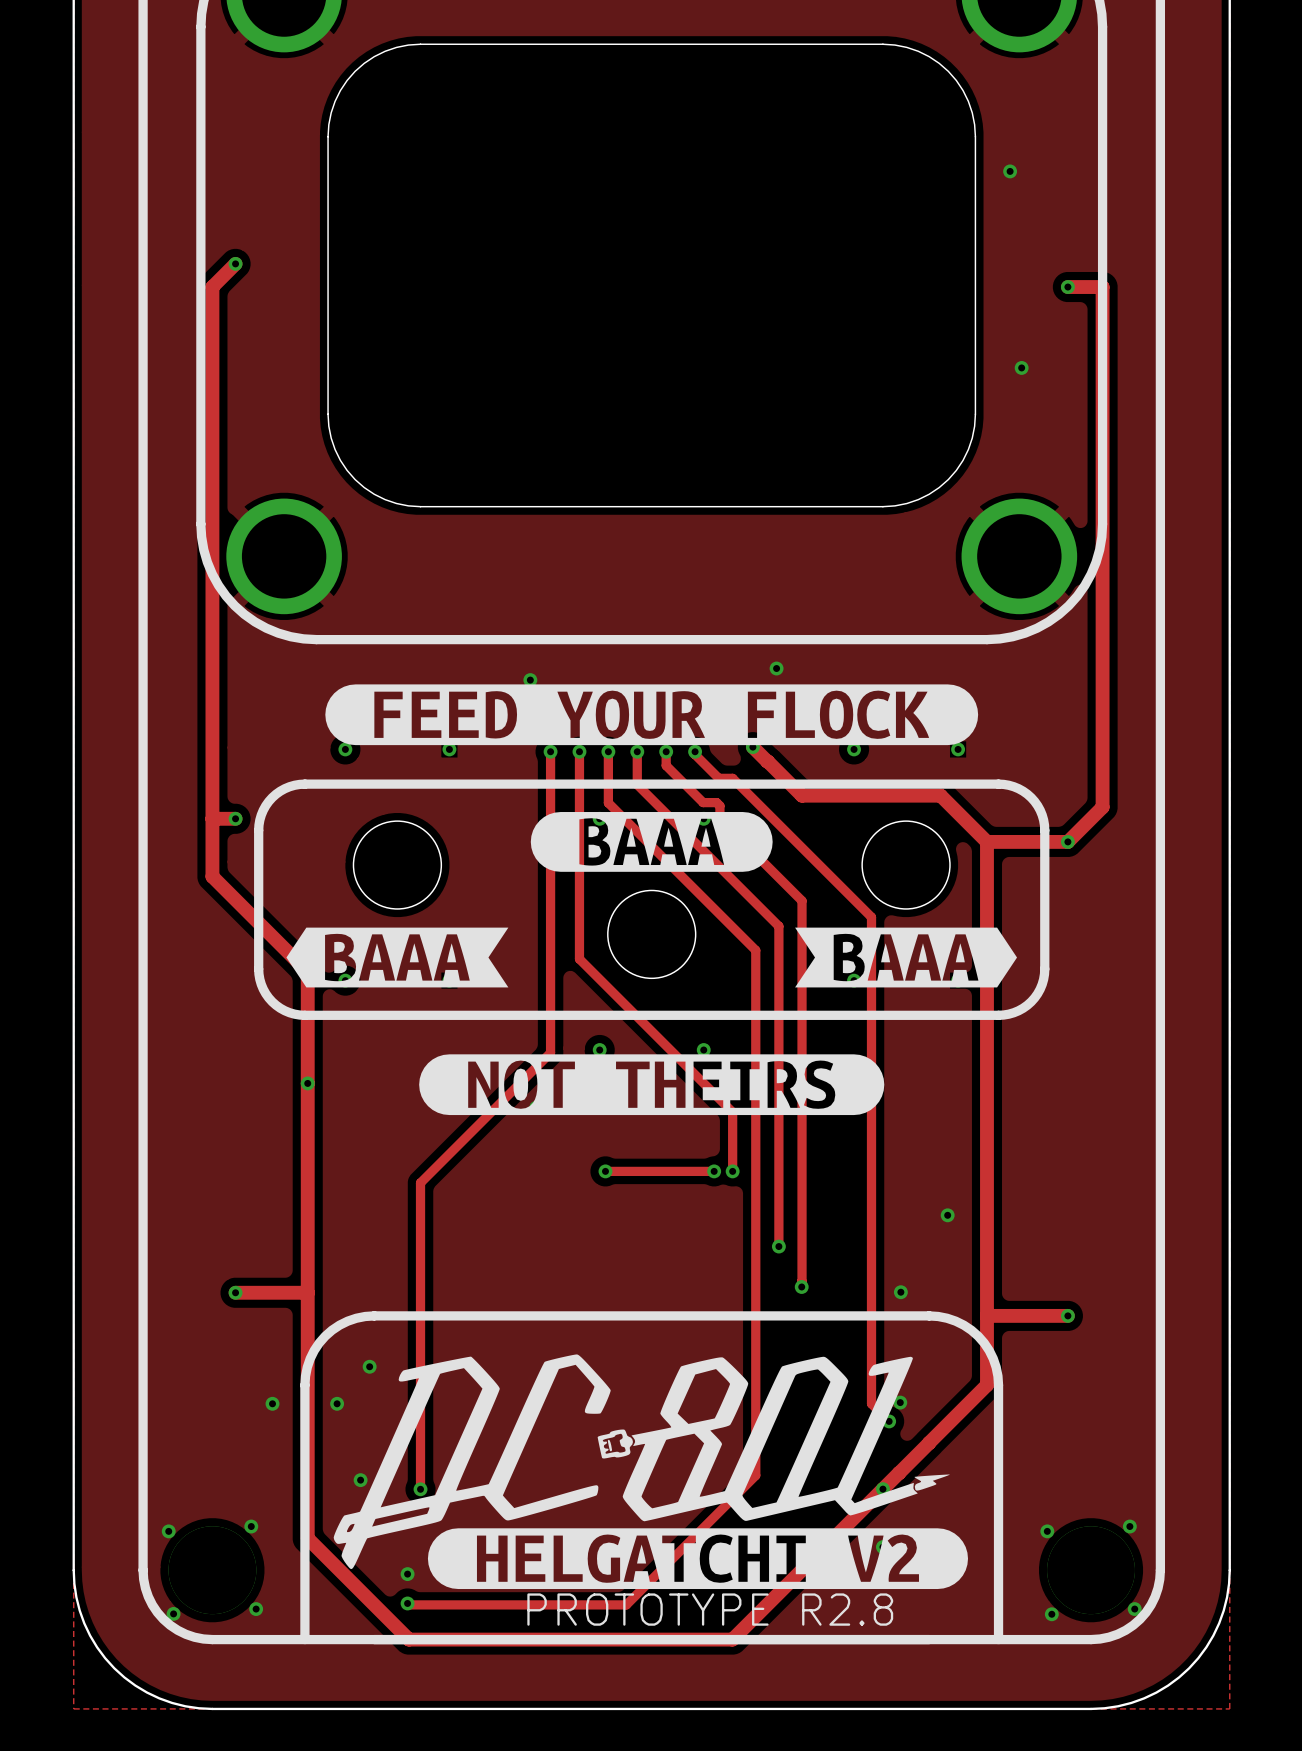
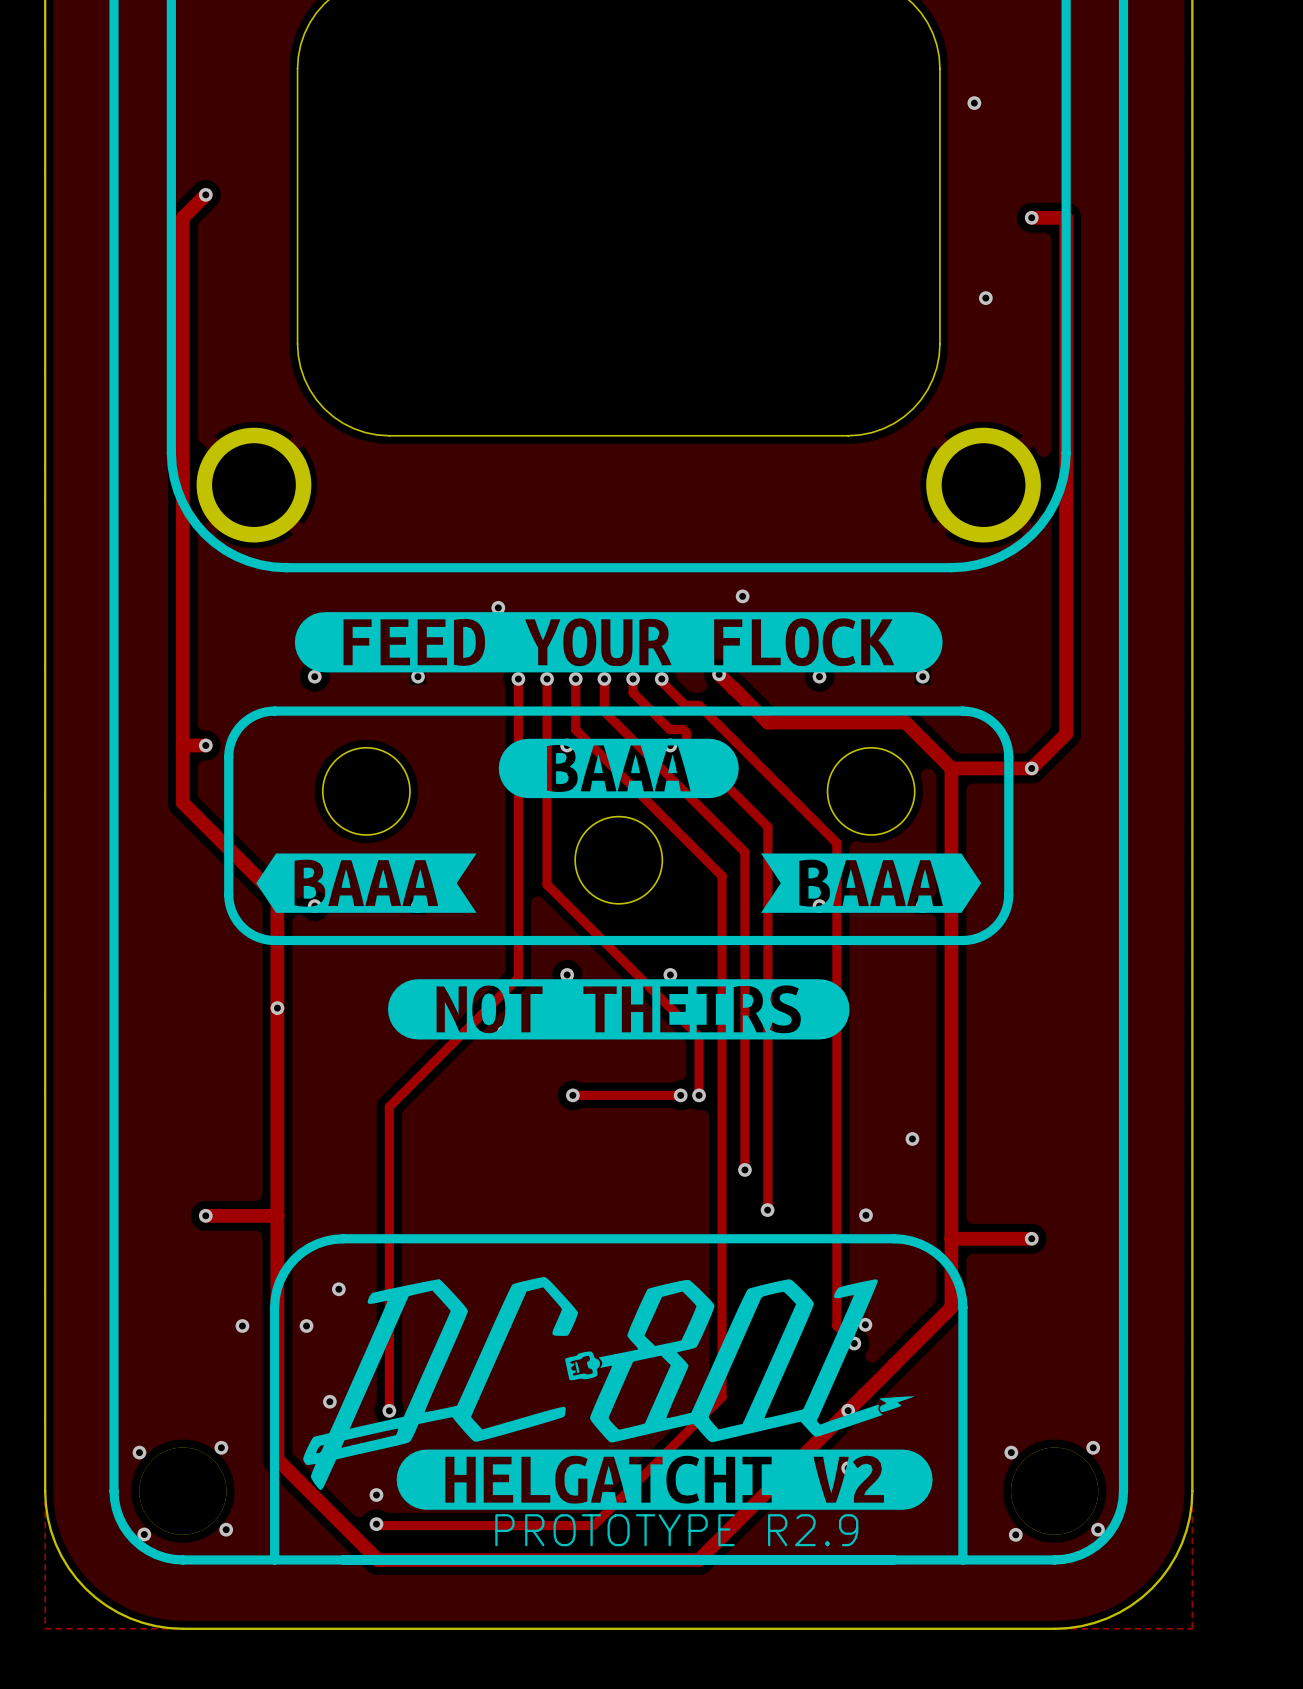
text: PROTOTYPE R2.8 (710, 1609) -> PROTOTYPE R2.9 (676, 1530)

